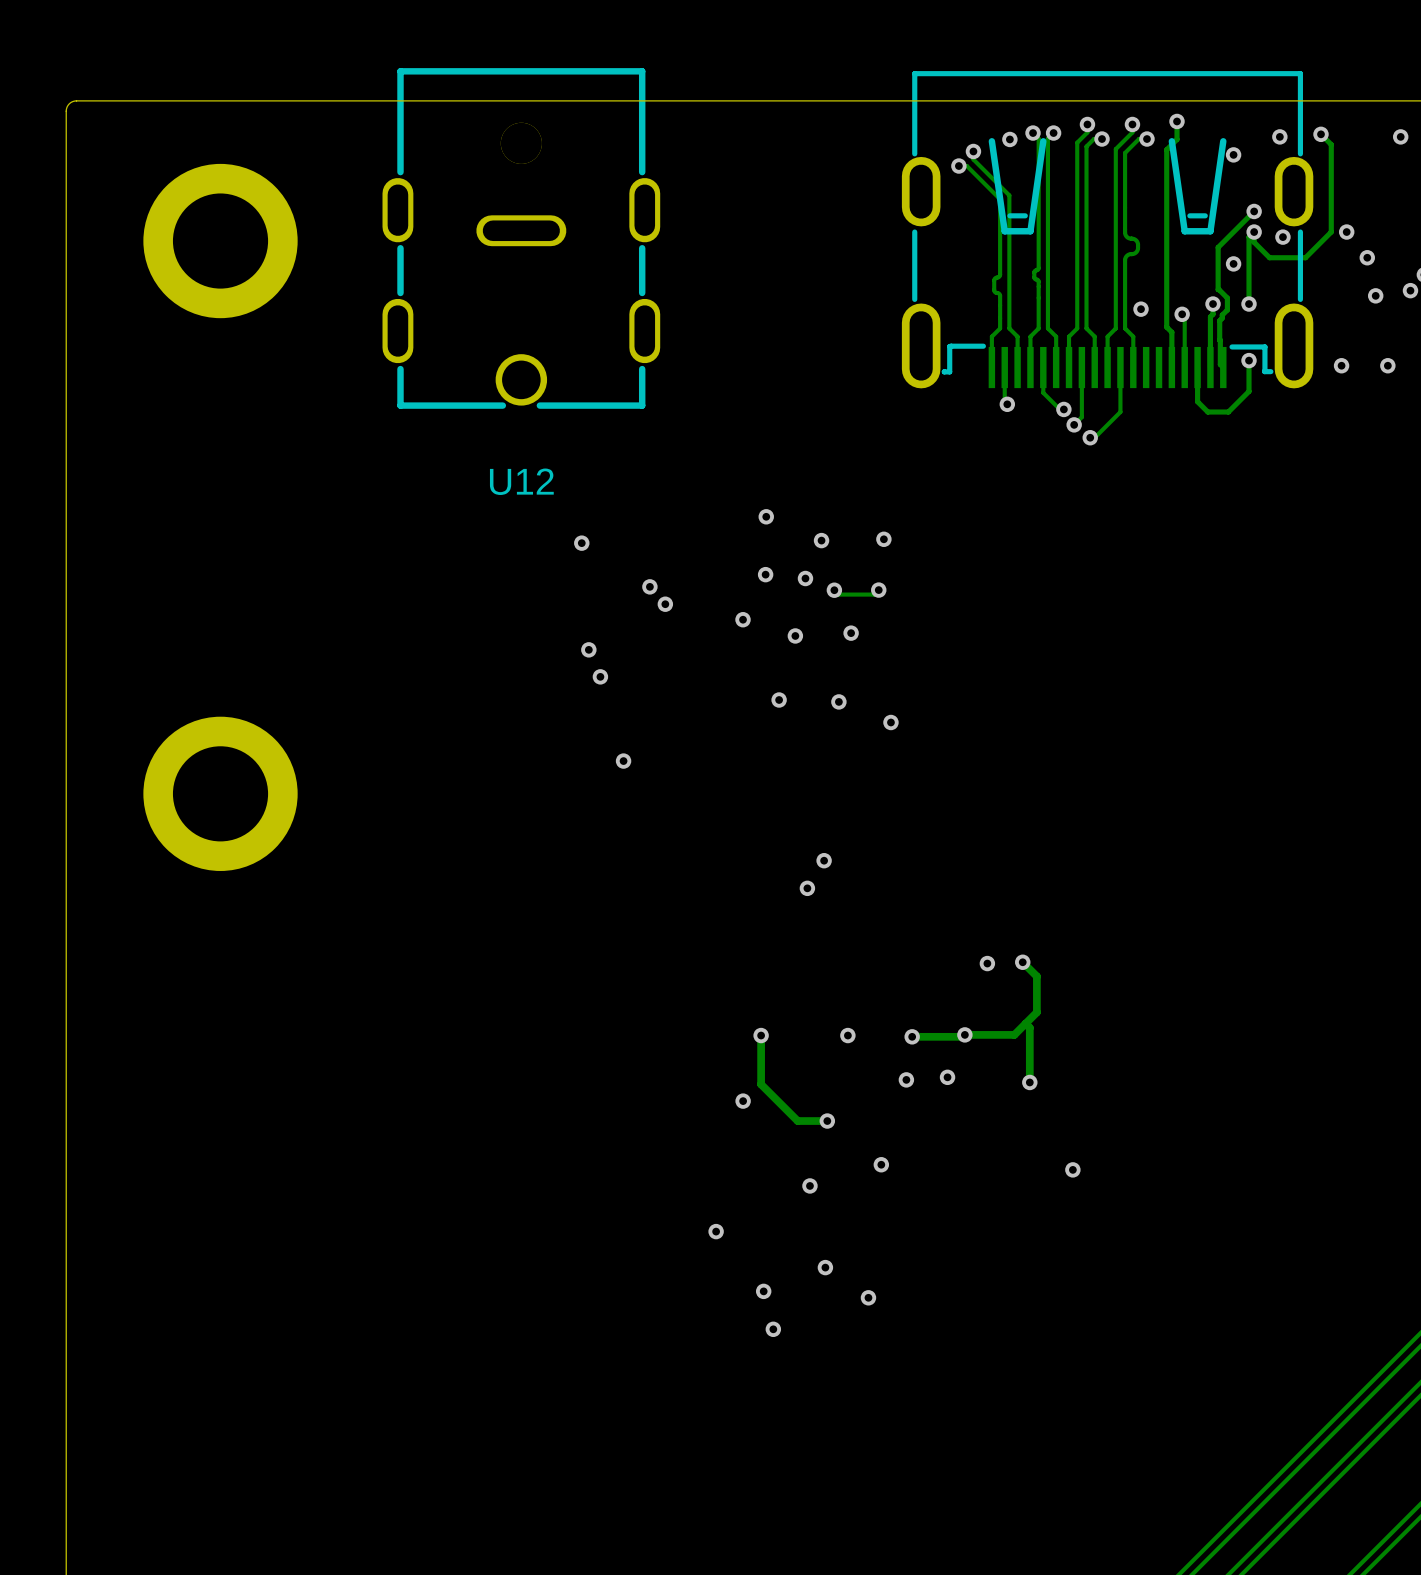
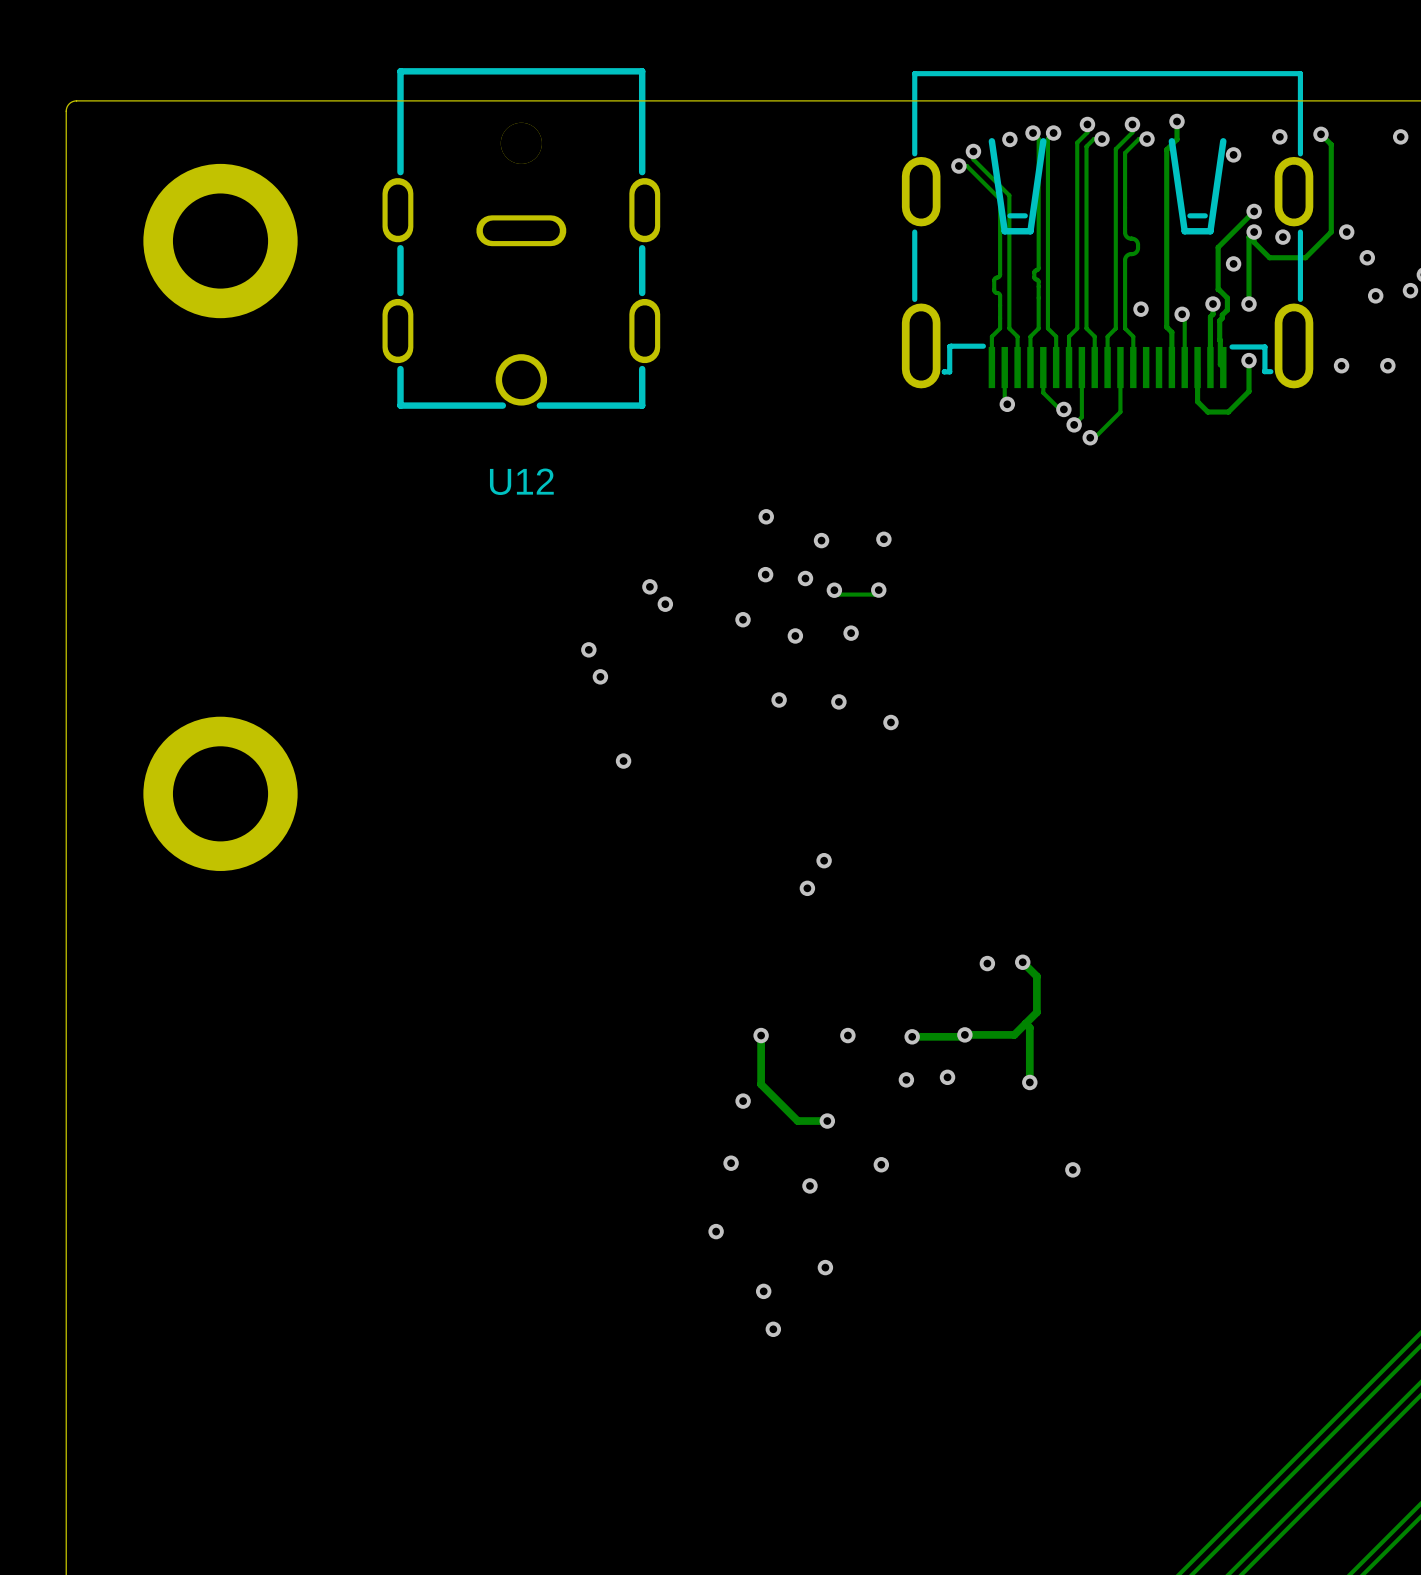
via: (581, 543) -> none
via: none -> (731, 1163)
via: (868, 1297) -> none

